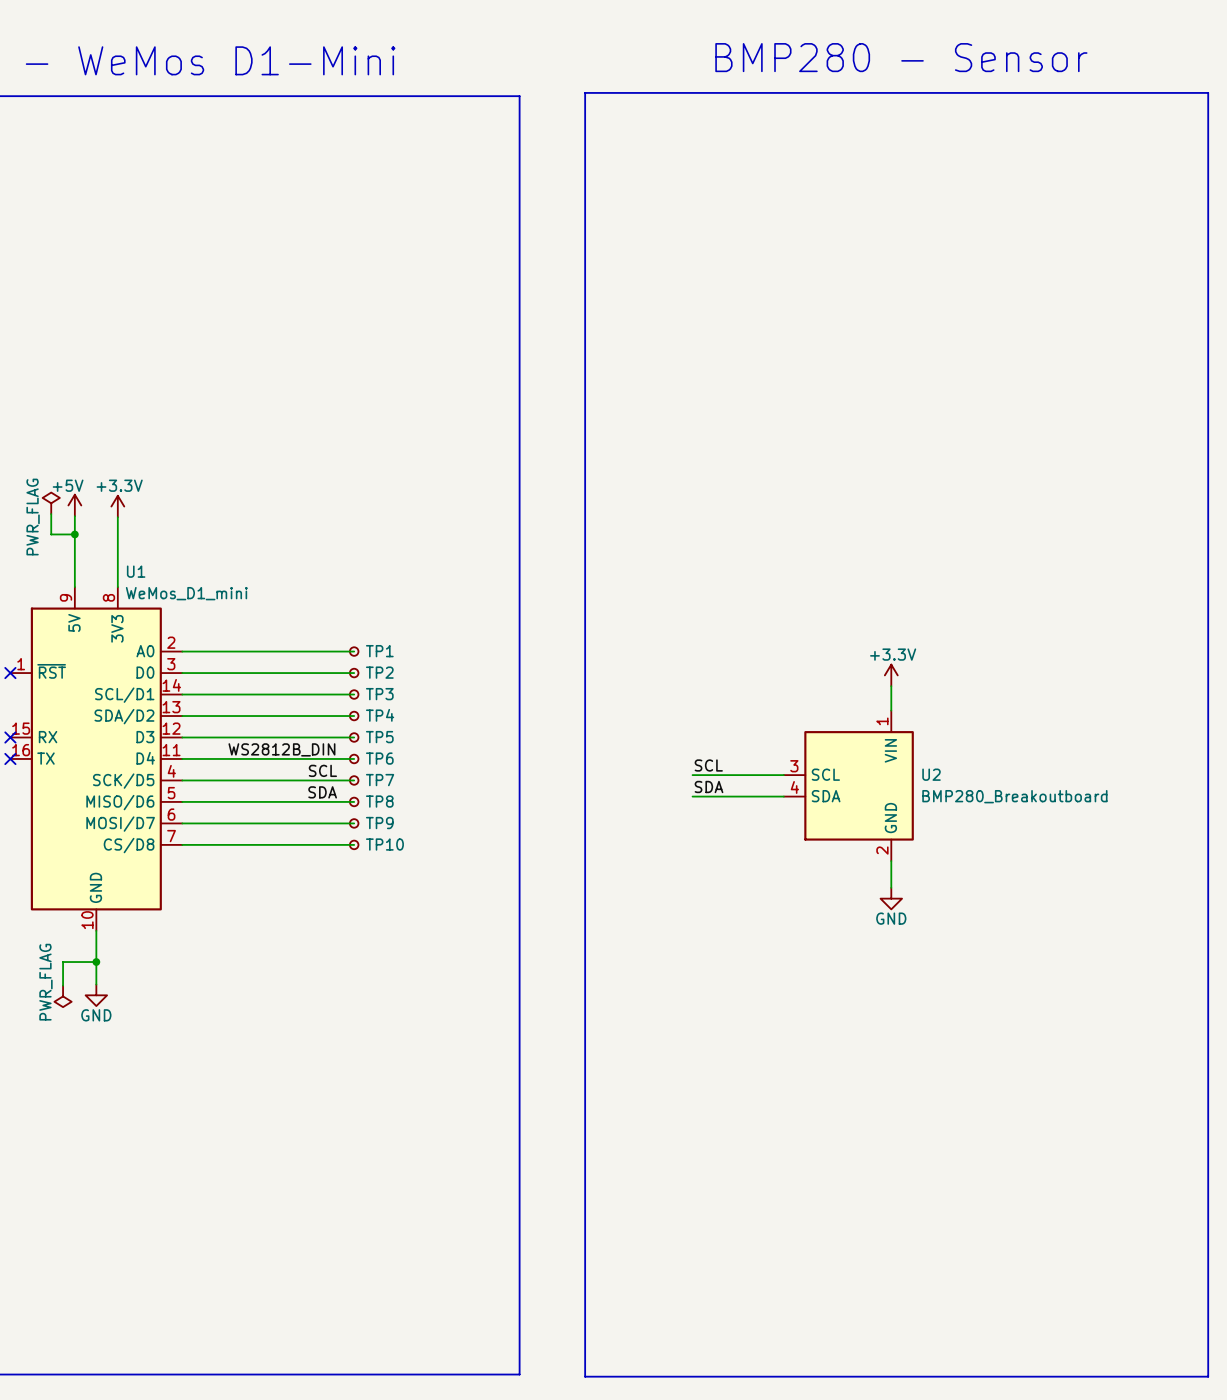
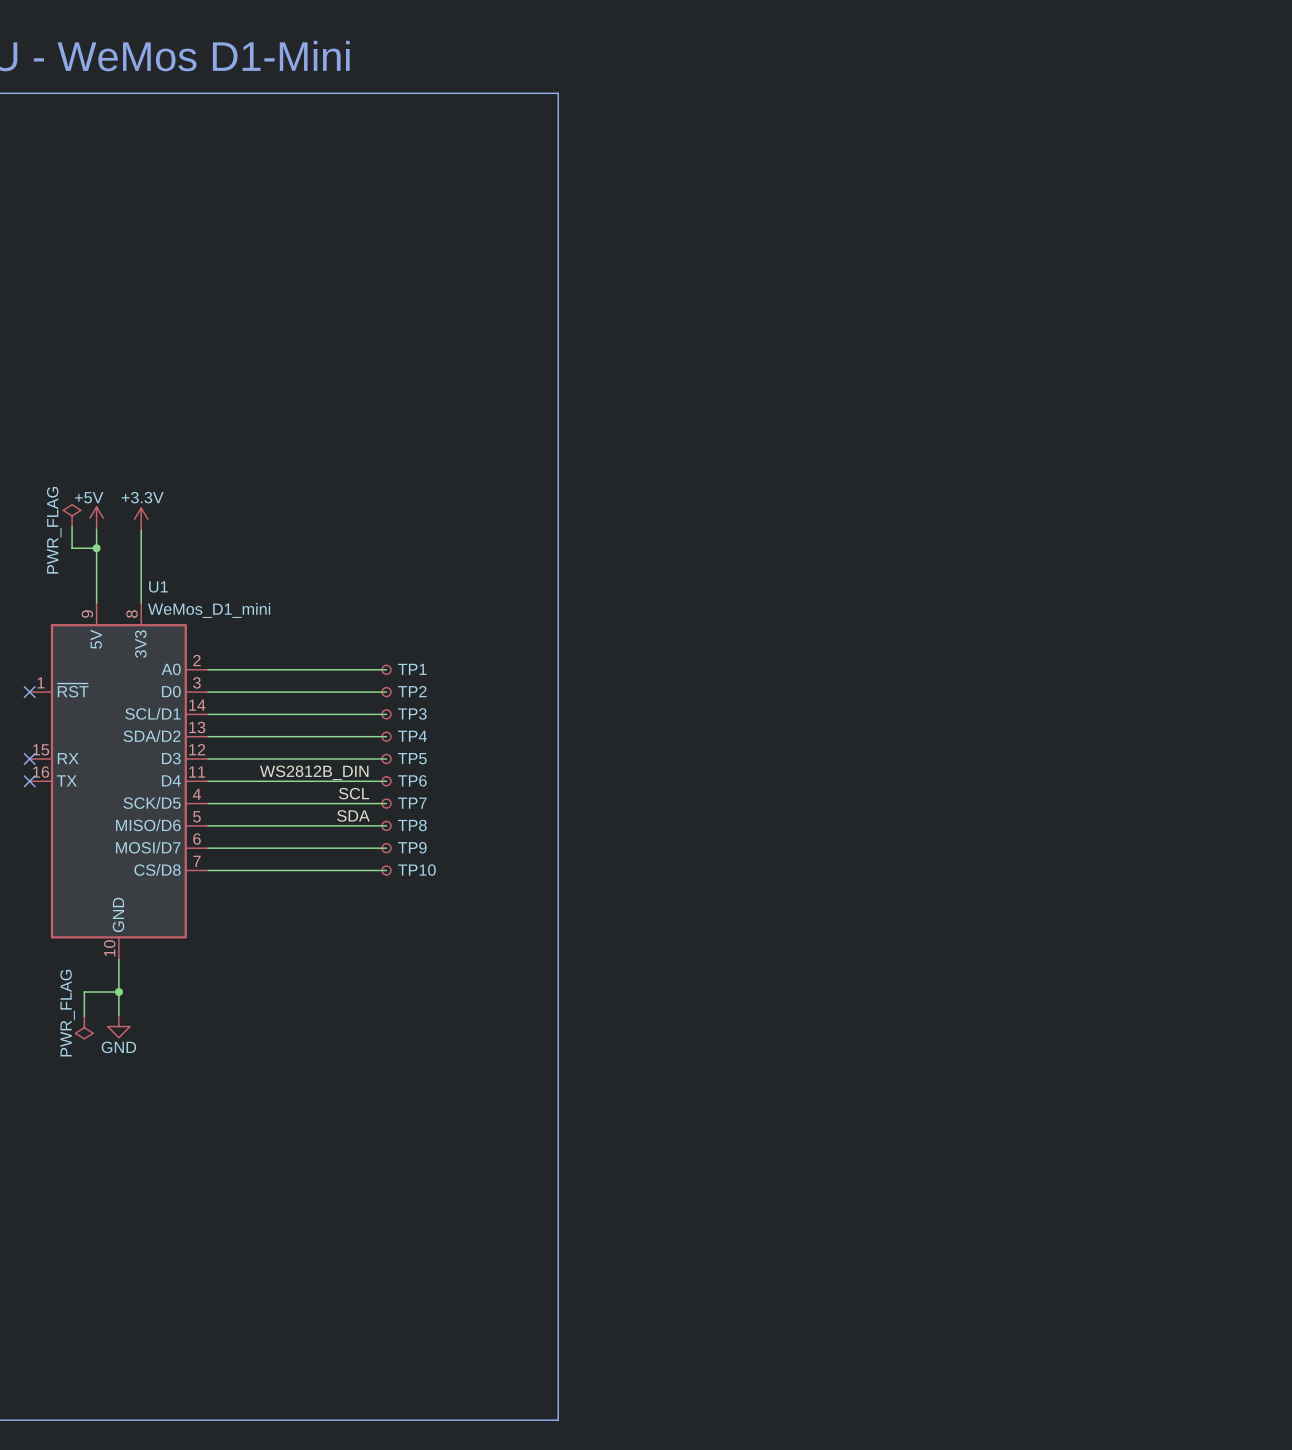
text: BMP280 - Sensor (901, 57) -> none
line: (585, 92) (585, 1376) (1208, 1376) (1208, 92) (585, 92) -> none
power symbol: +3.3V (891, 675) -> none
wire: (891, 686) (891, 710) -> none
label: SCL (708, 765) -> none
wire: (692, 775) (783, 775) -> none
U2: BMP280_Breakoutboard (848, 785) -> none
label: SDA (709, 786) -> none
wire: (692, 796) (783, 796) -> none
wire: (891, 861) (891, 887) -> none
power symbol: GND (891, 898) -> none

